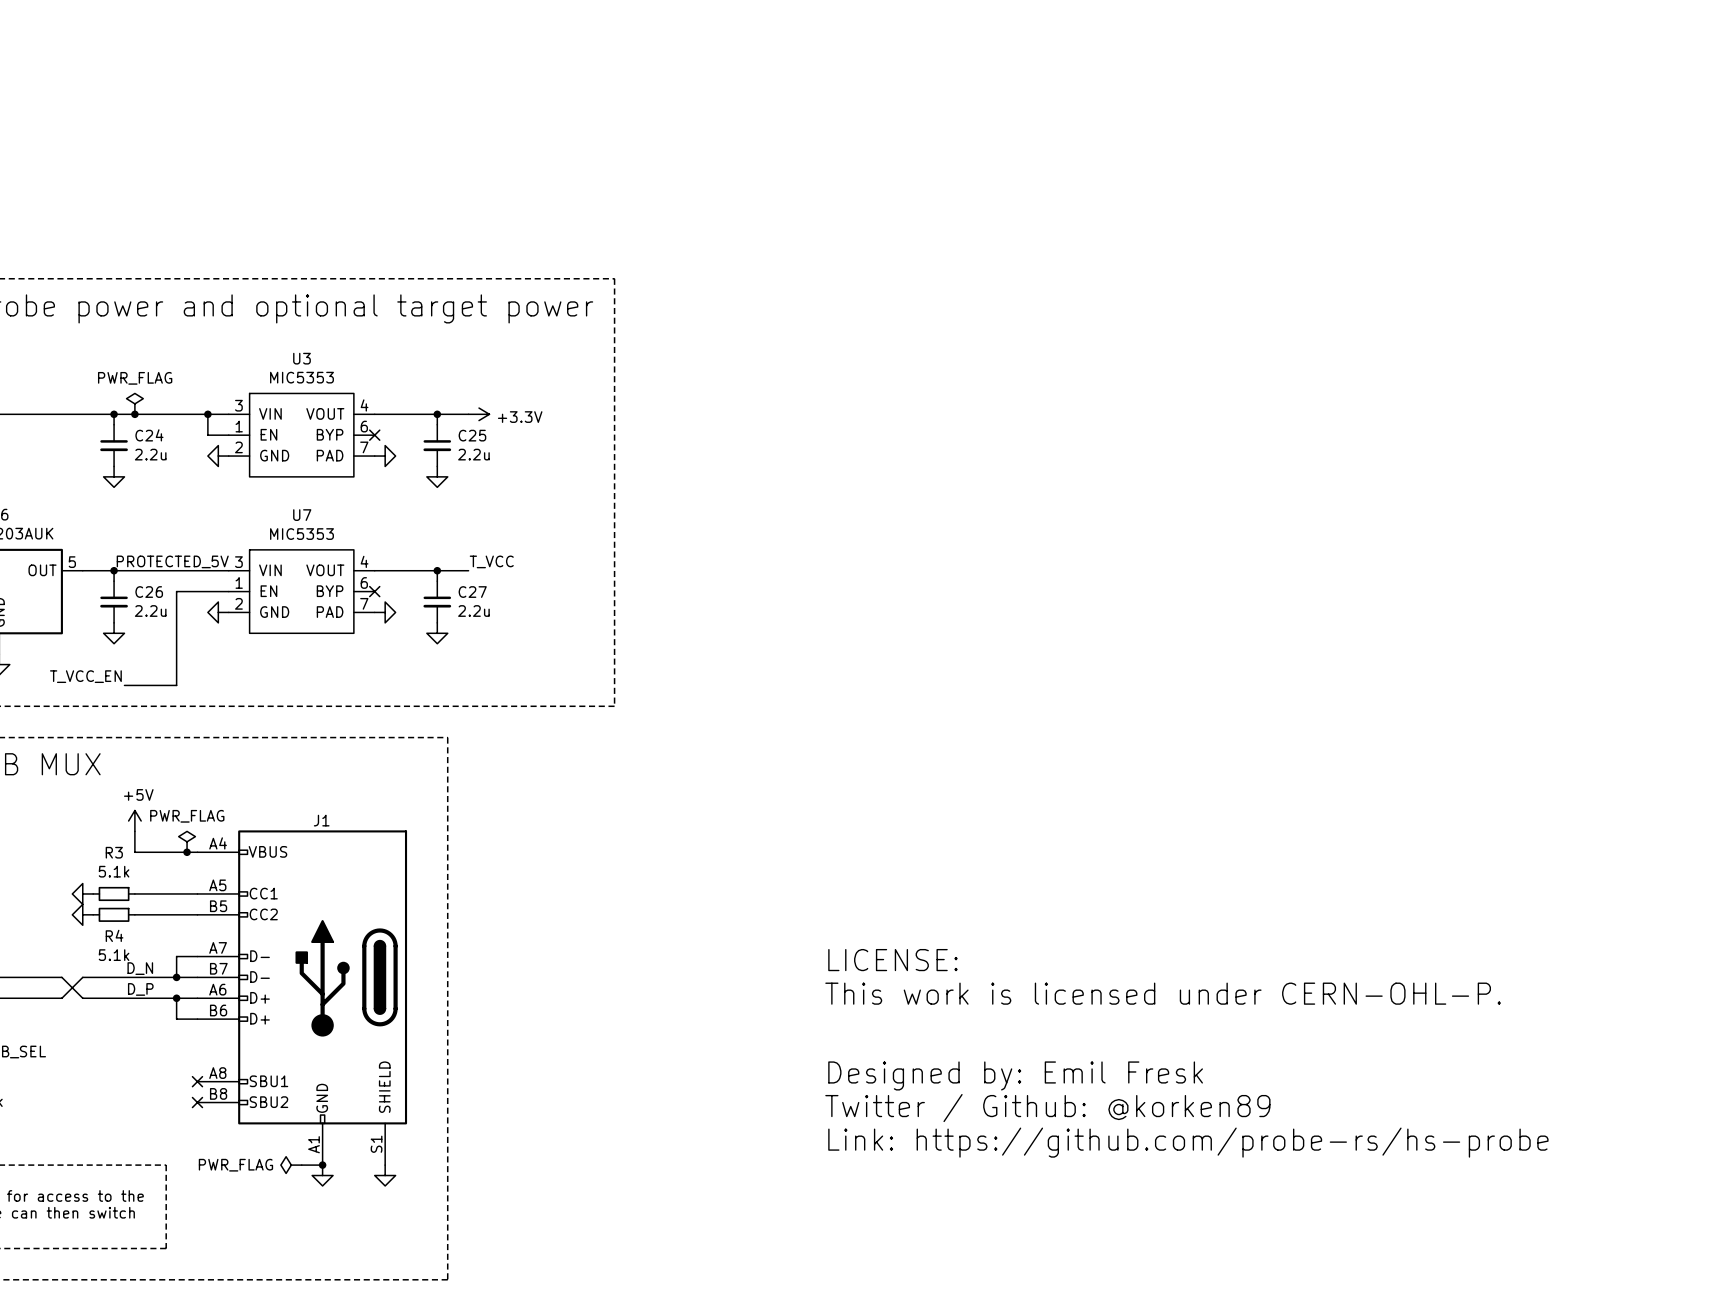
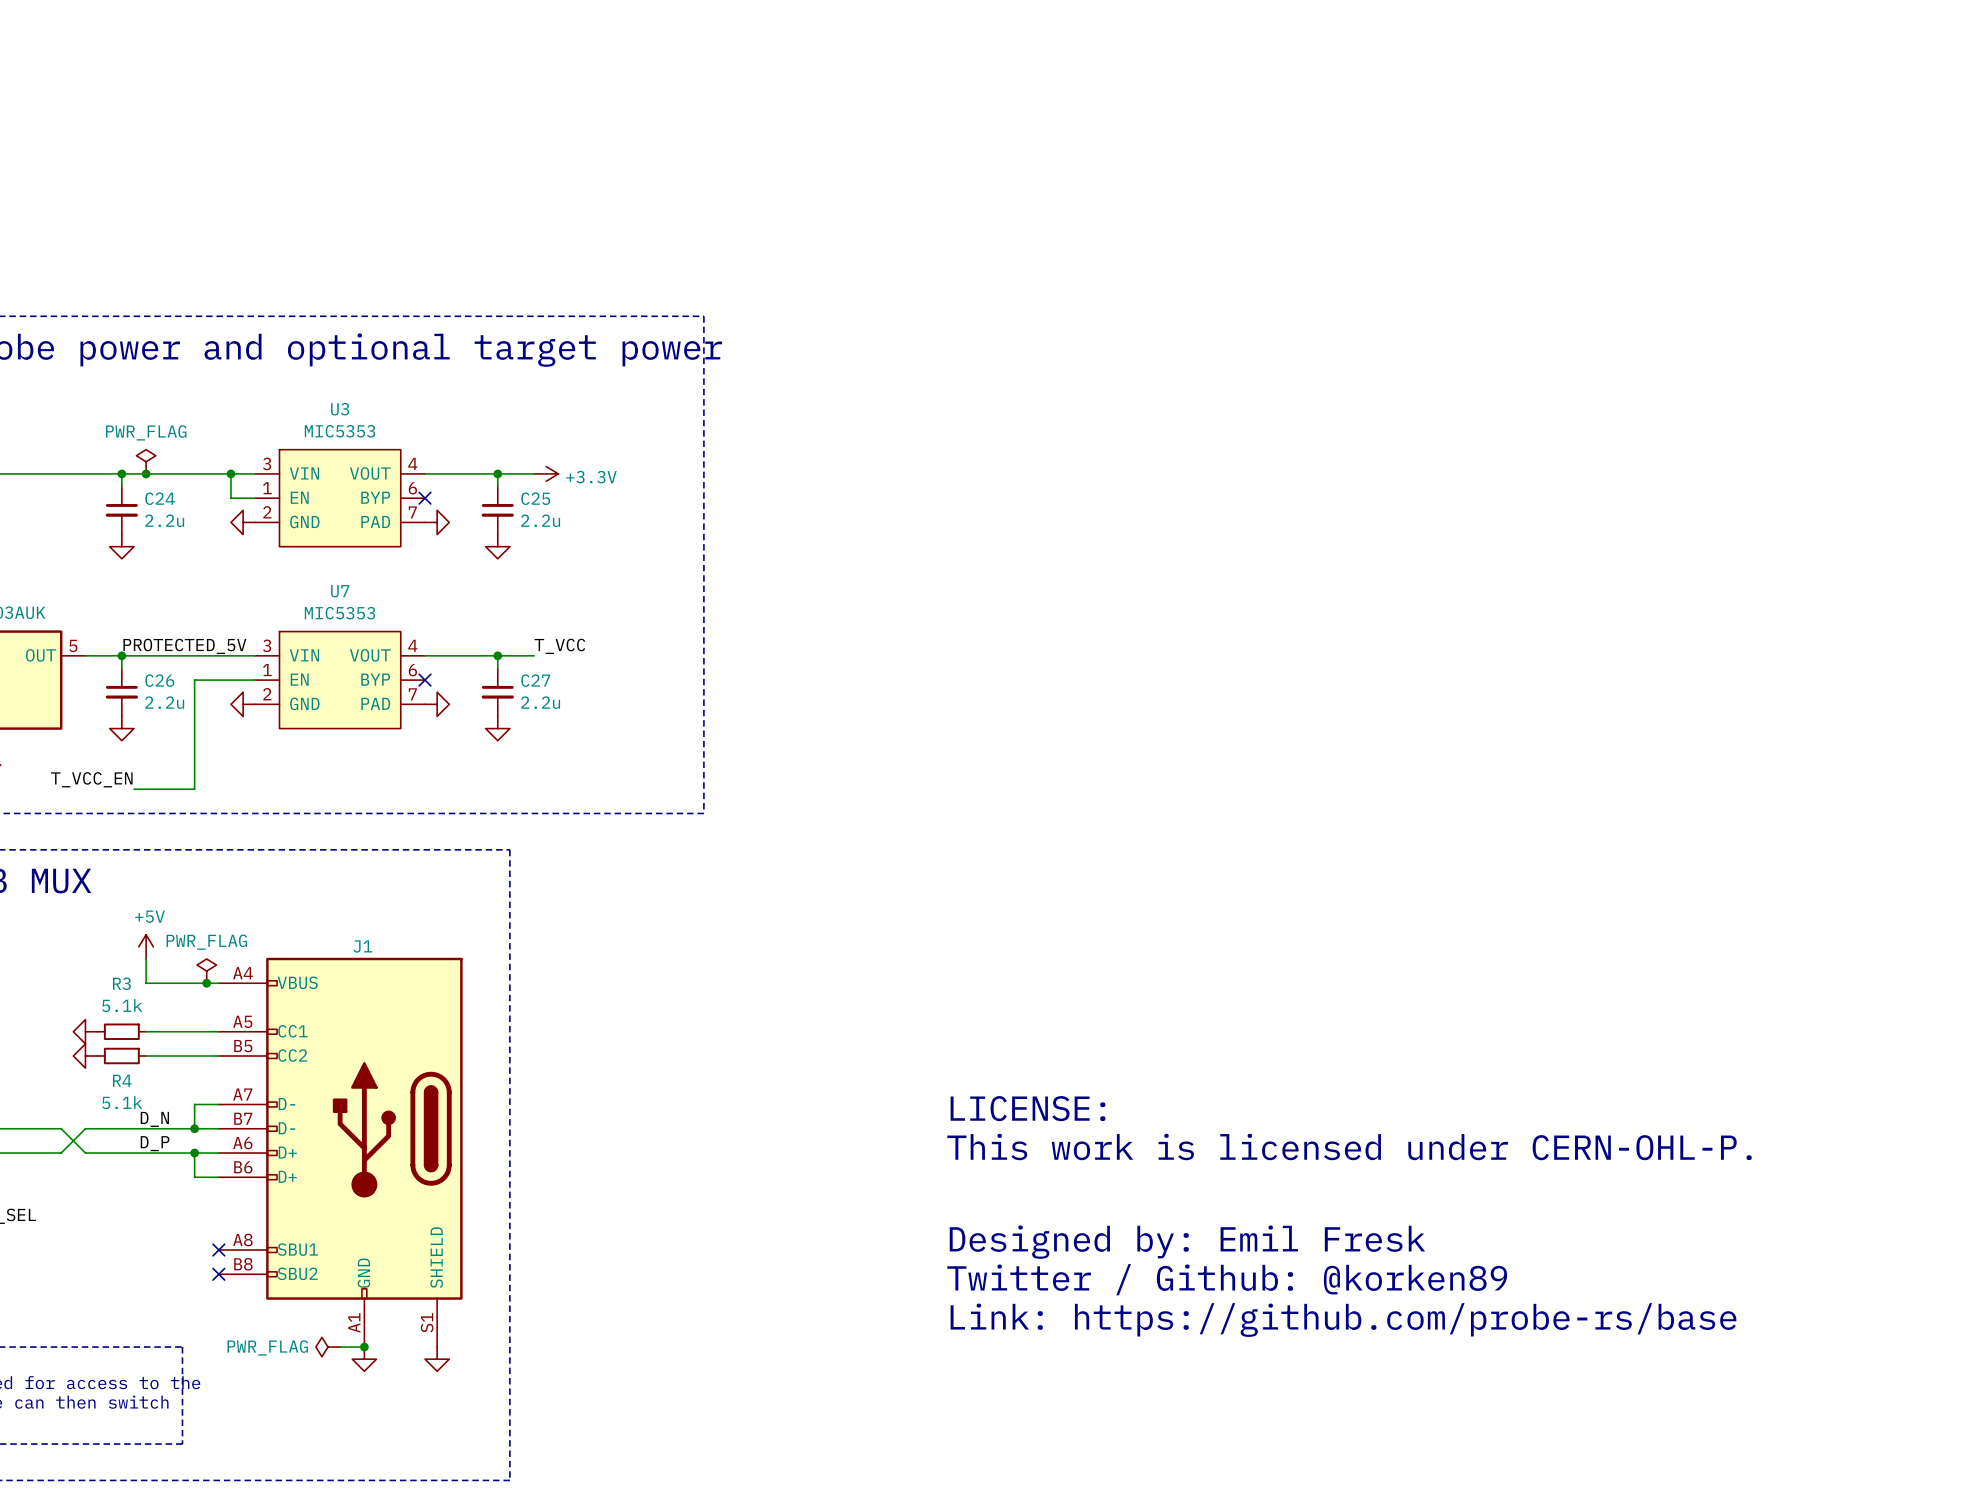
text: Link: https://github.com/probe-rs/hs-probe (1188, 1142) -> Link: https://github.com/probe-rs/base (1343, 1320)

